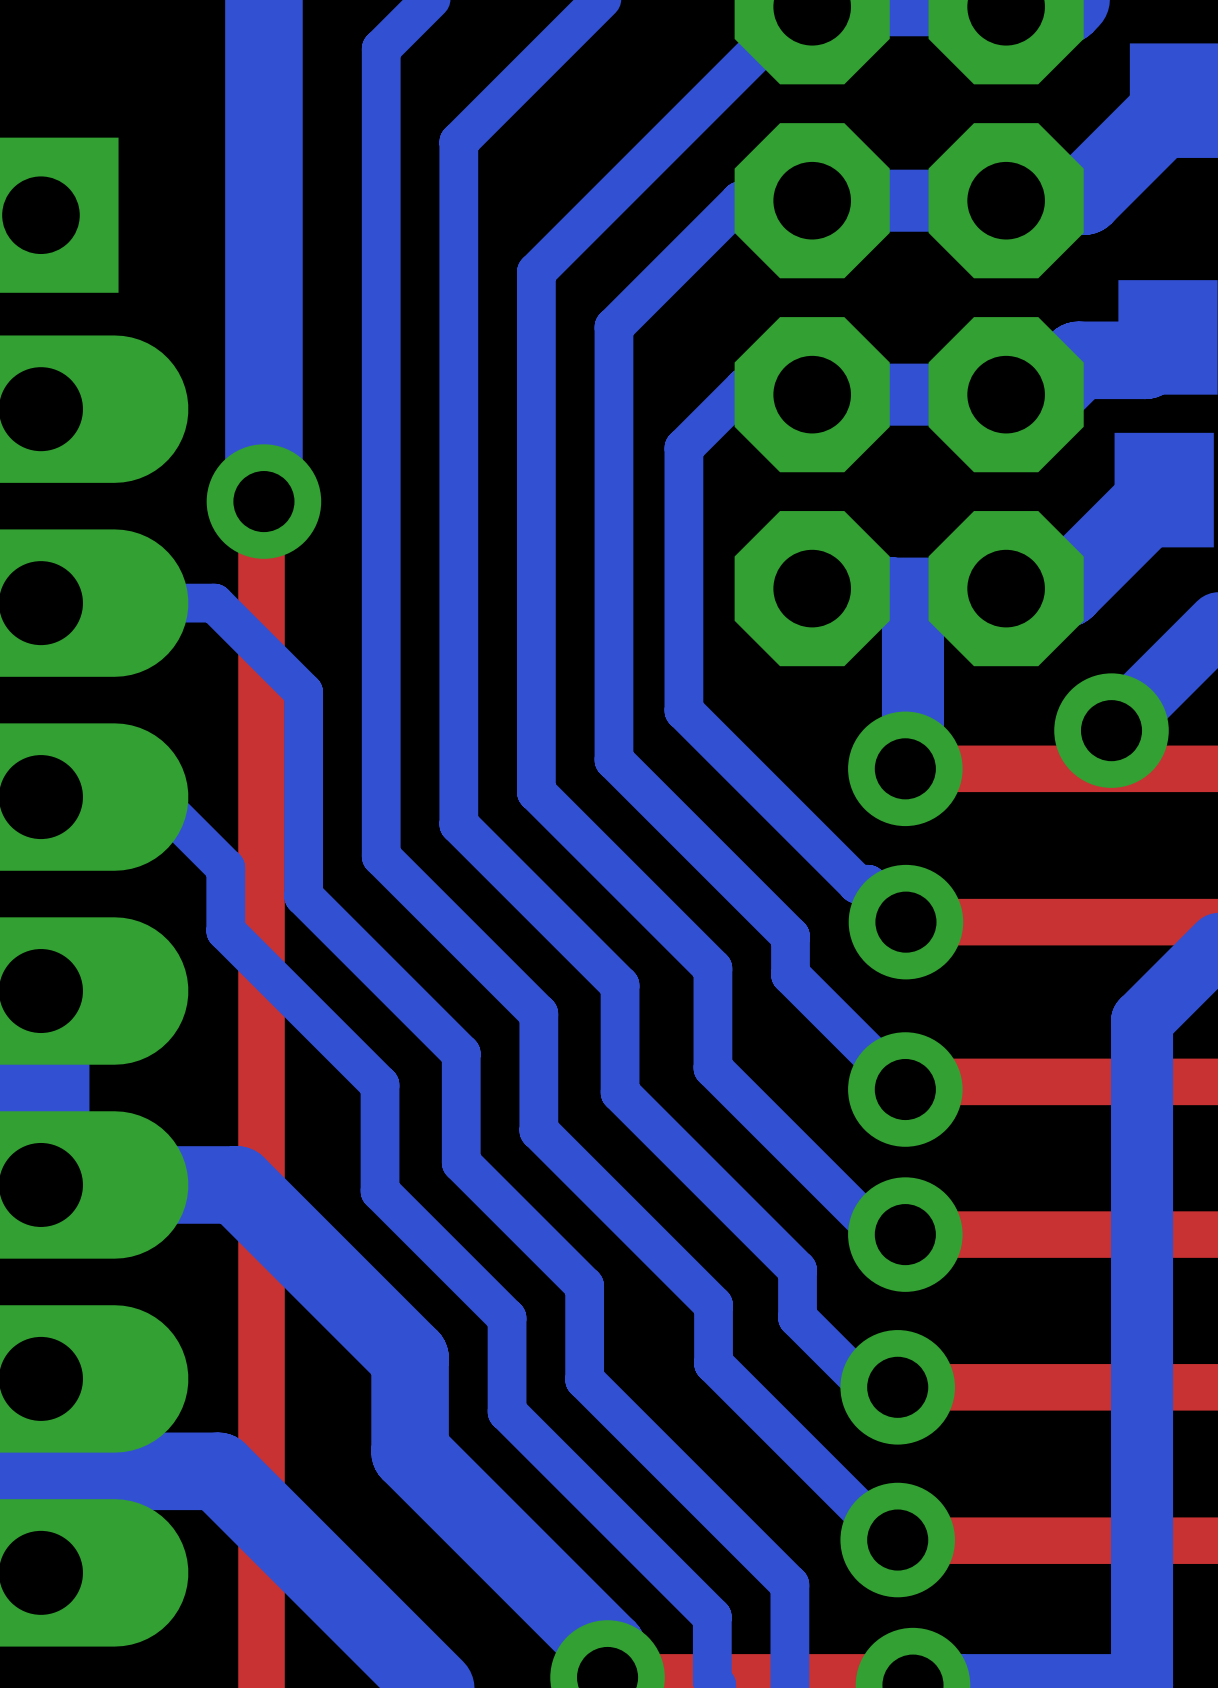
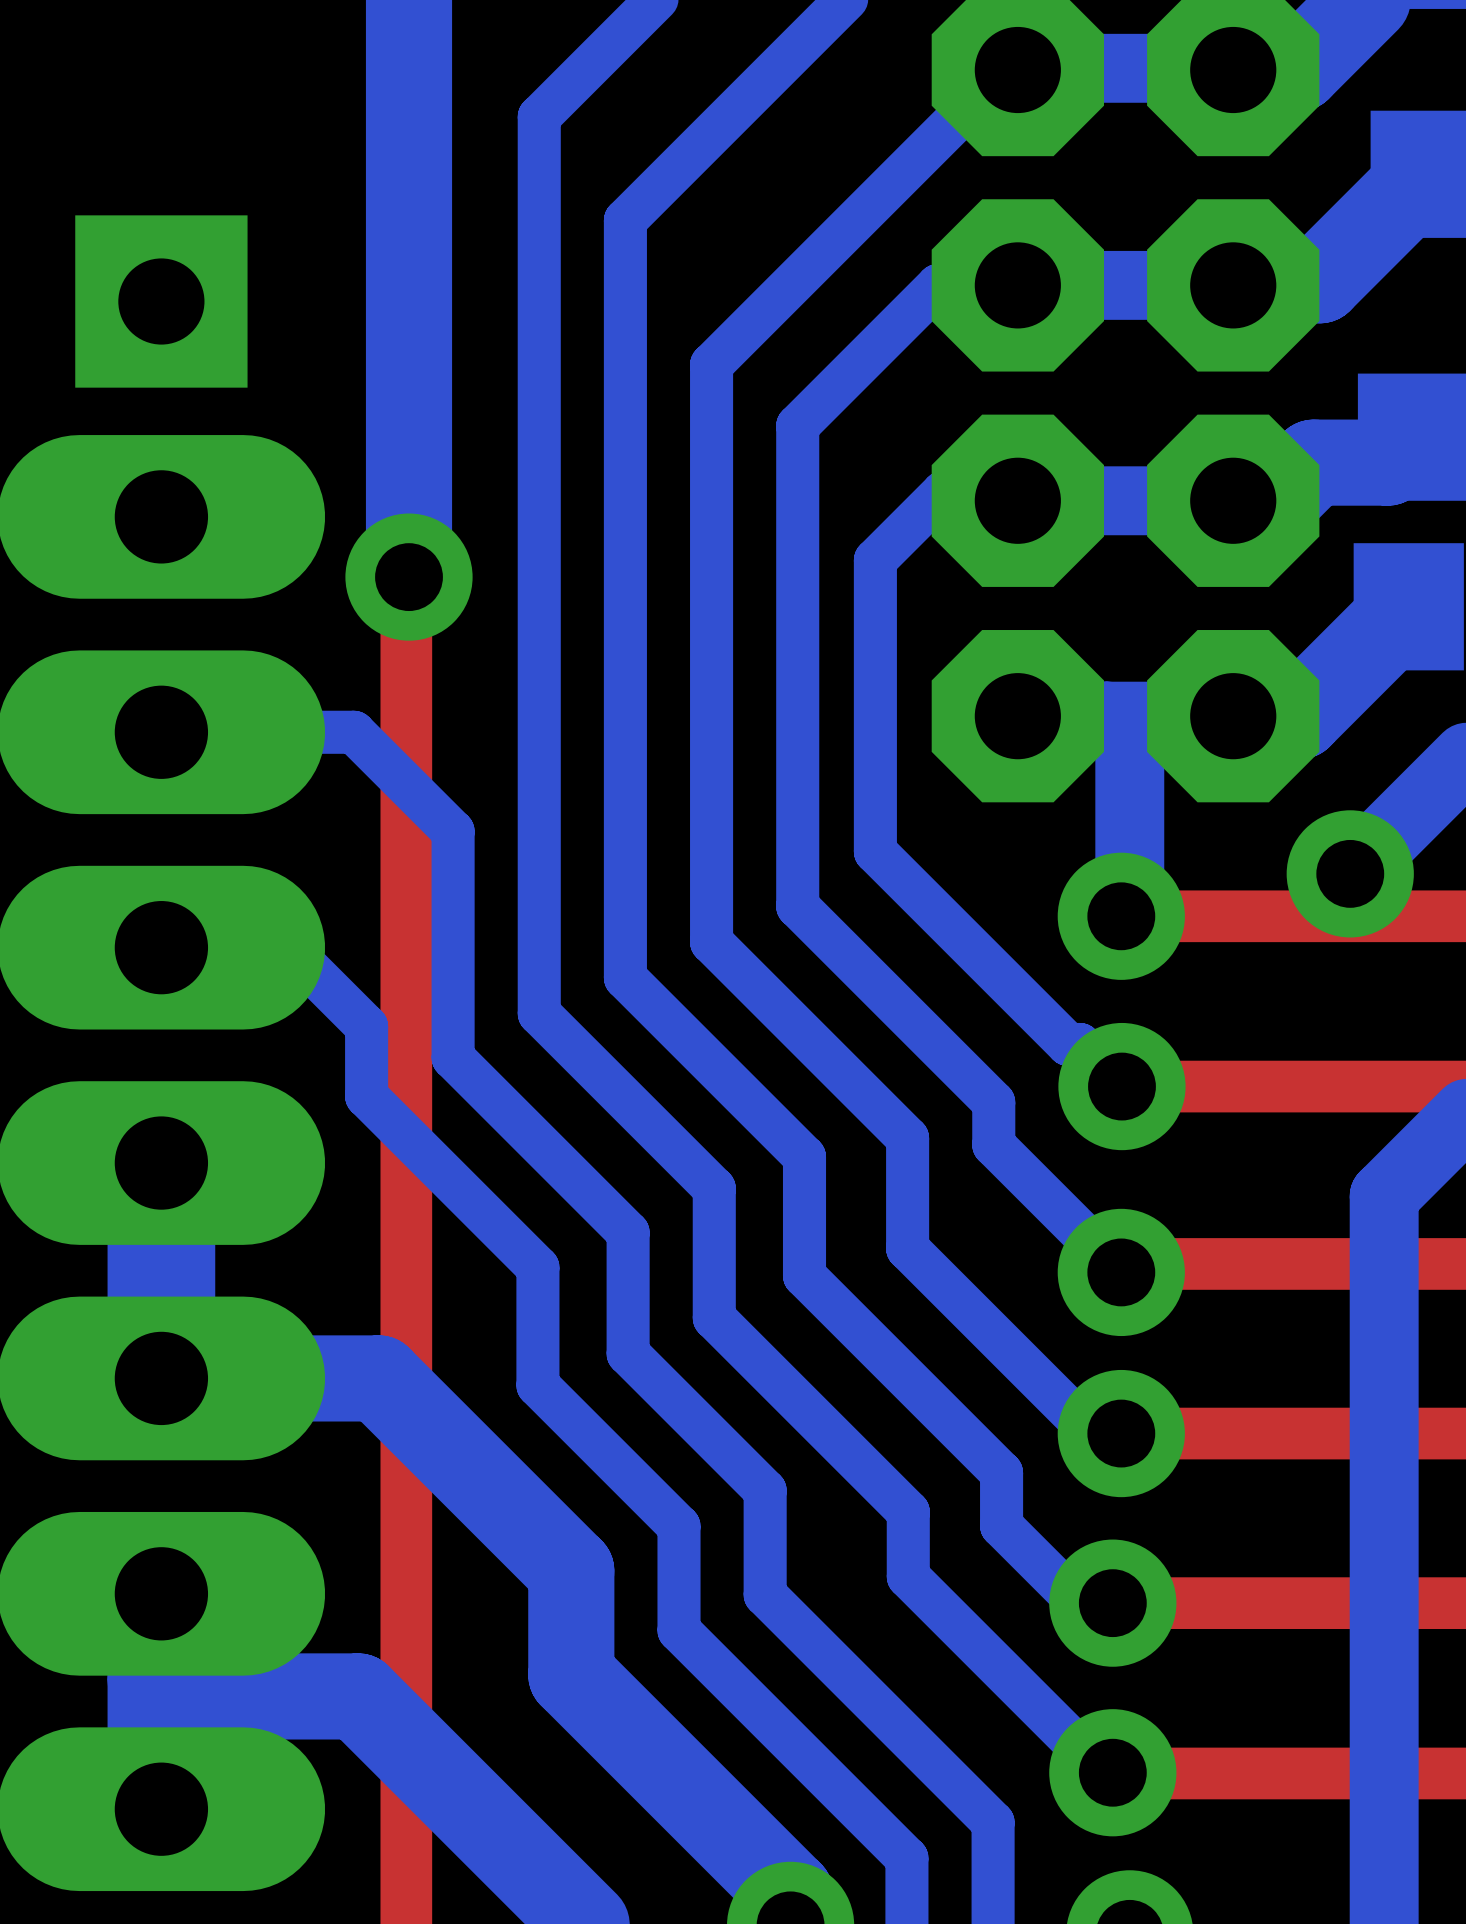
via position: (263, 501) -> (409, 577)

